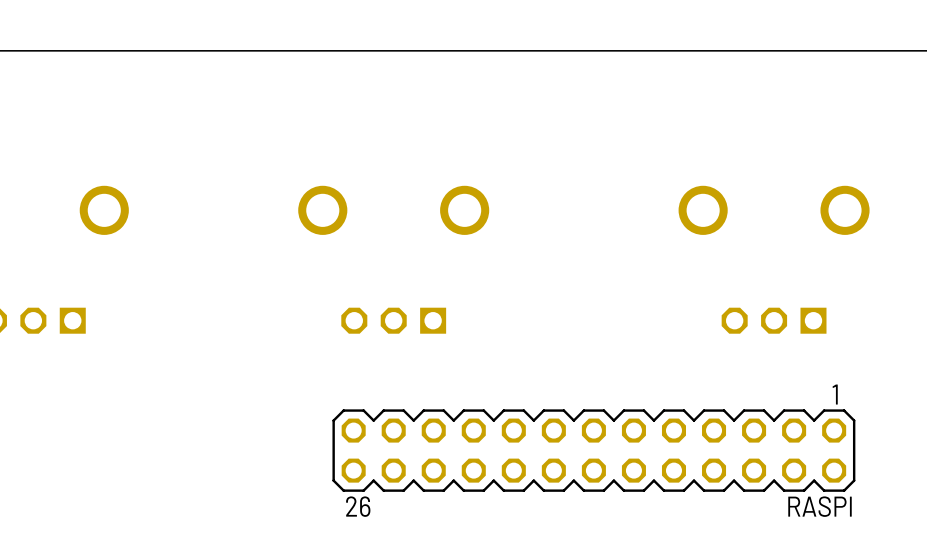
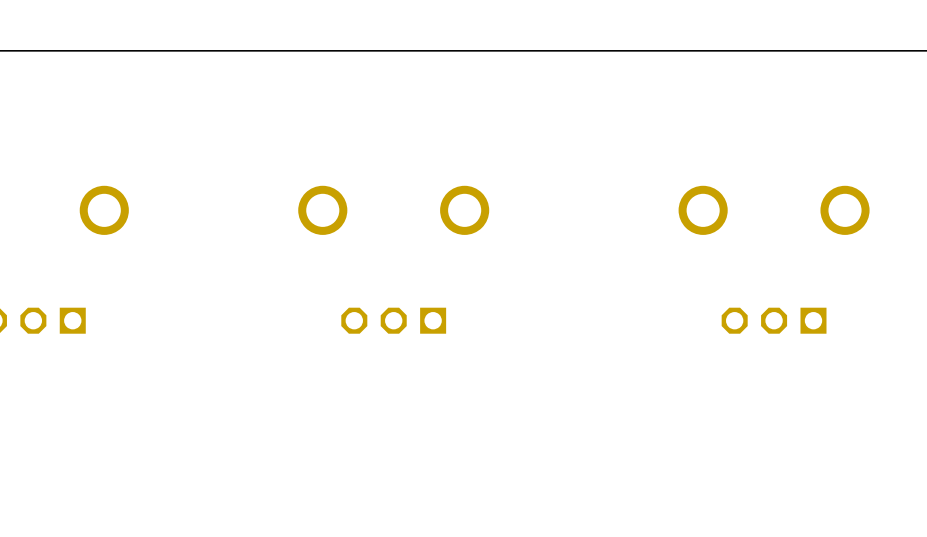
RASPI: (593, 450) -> none

